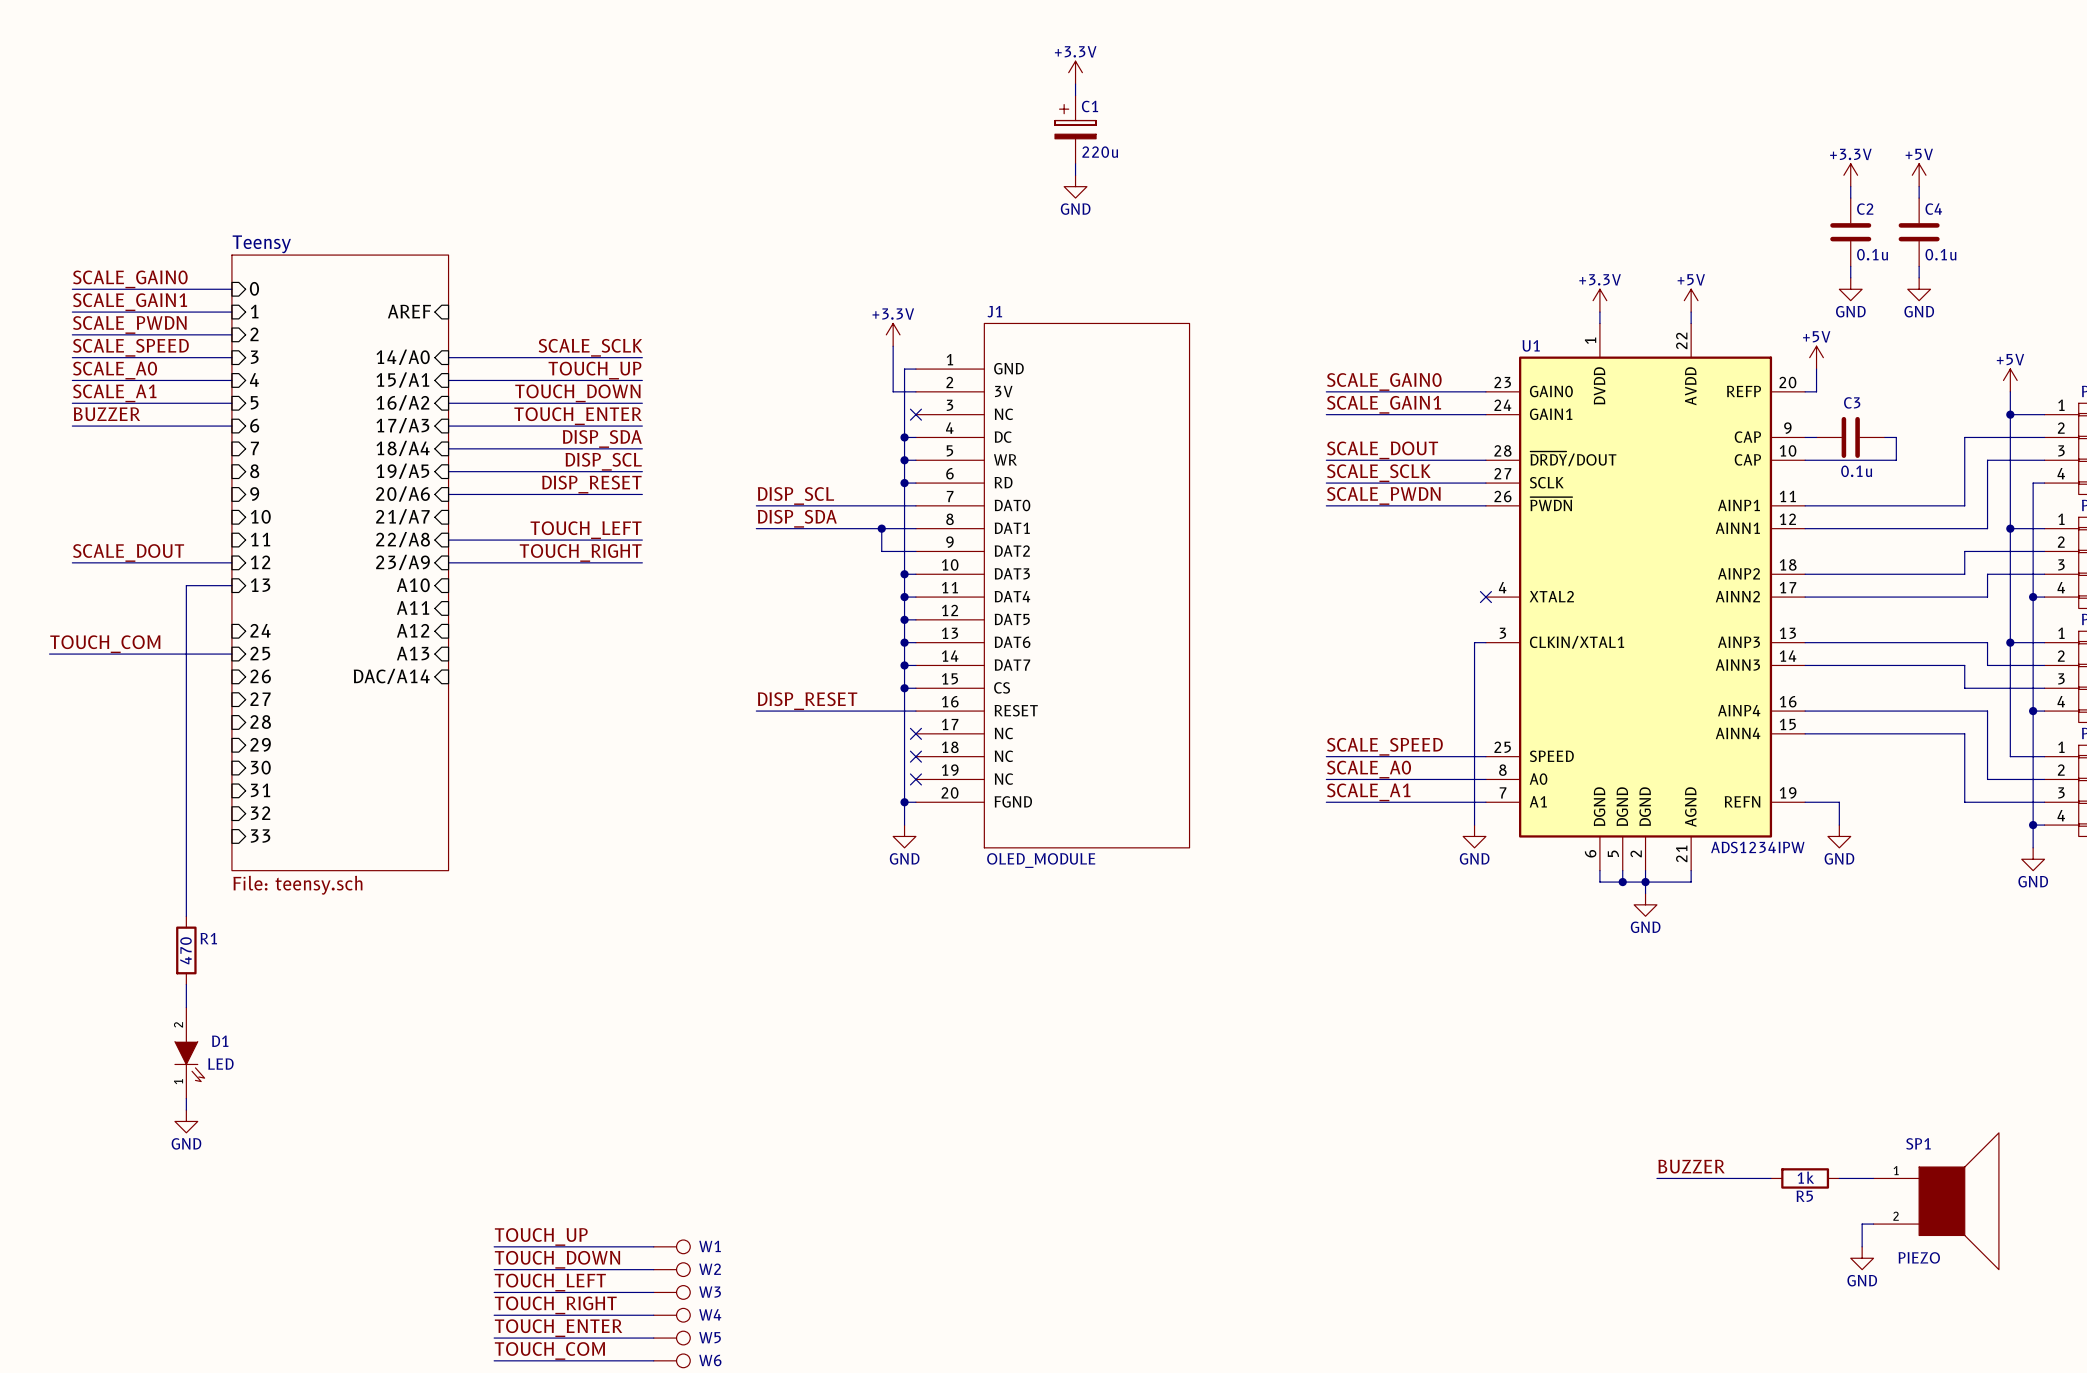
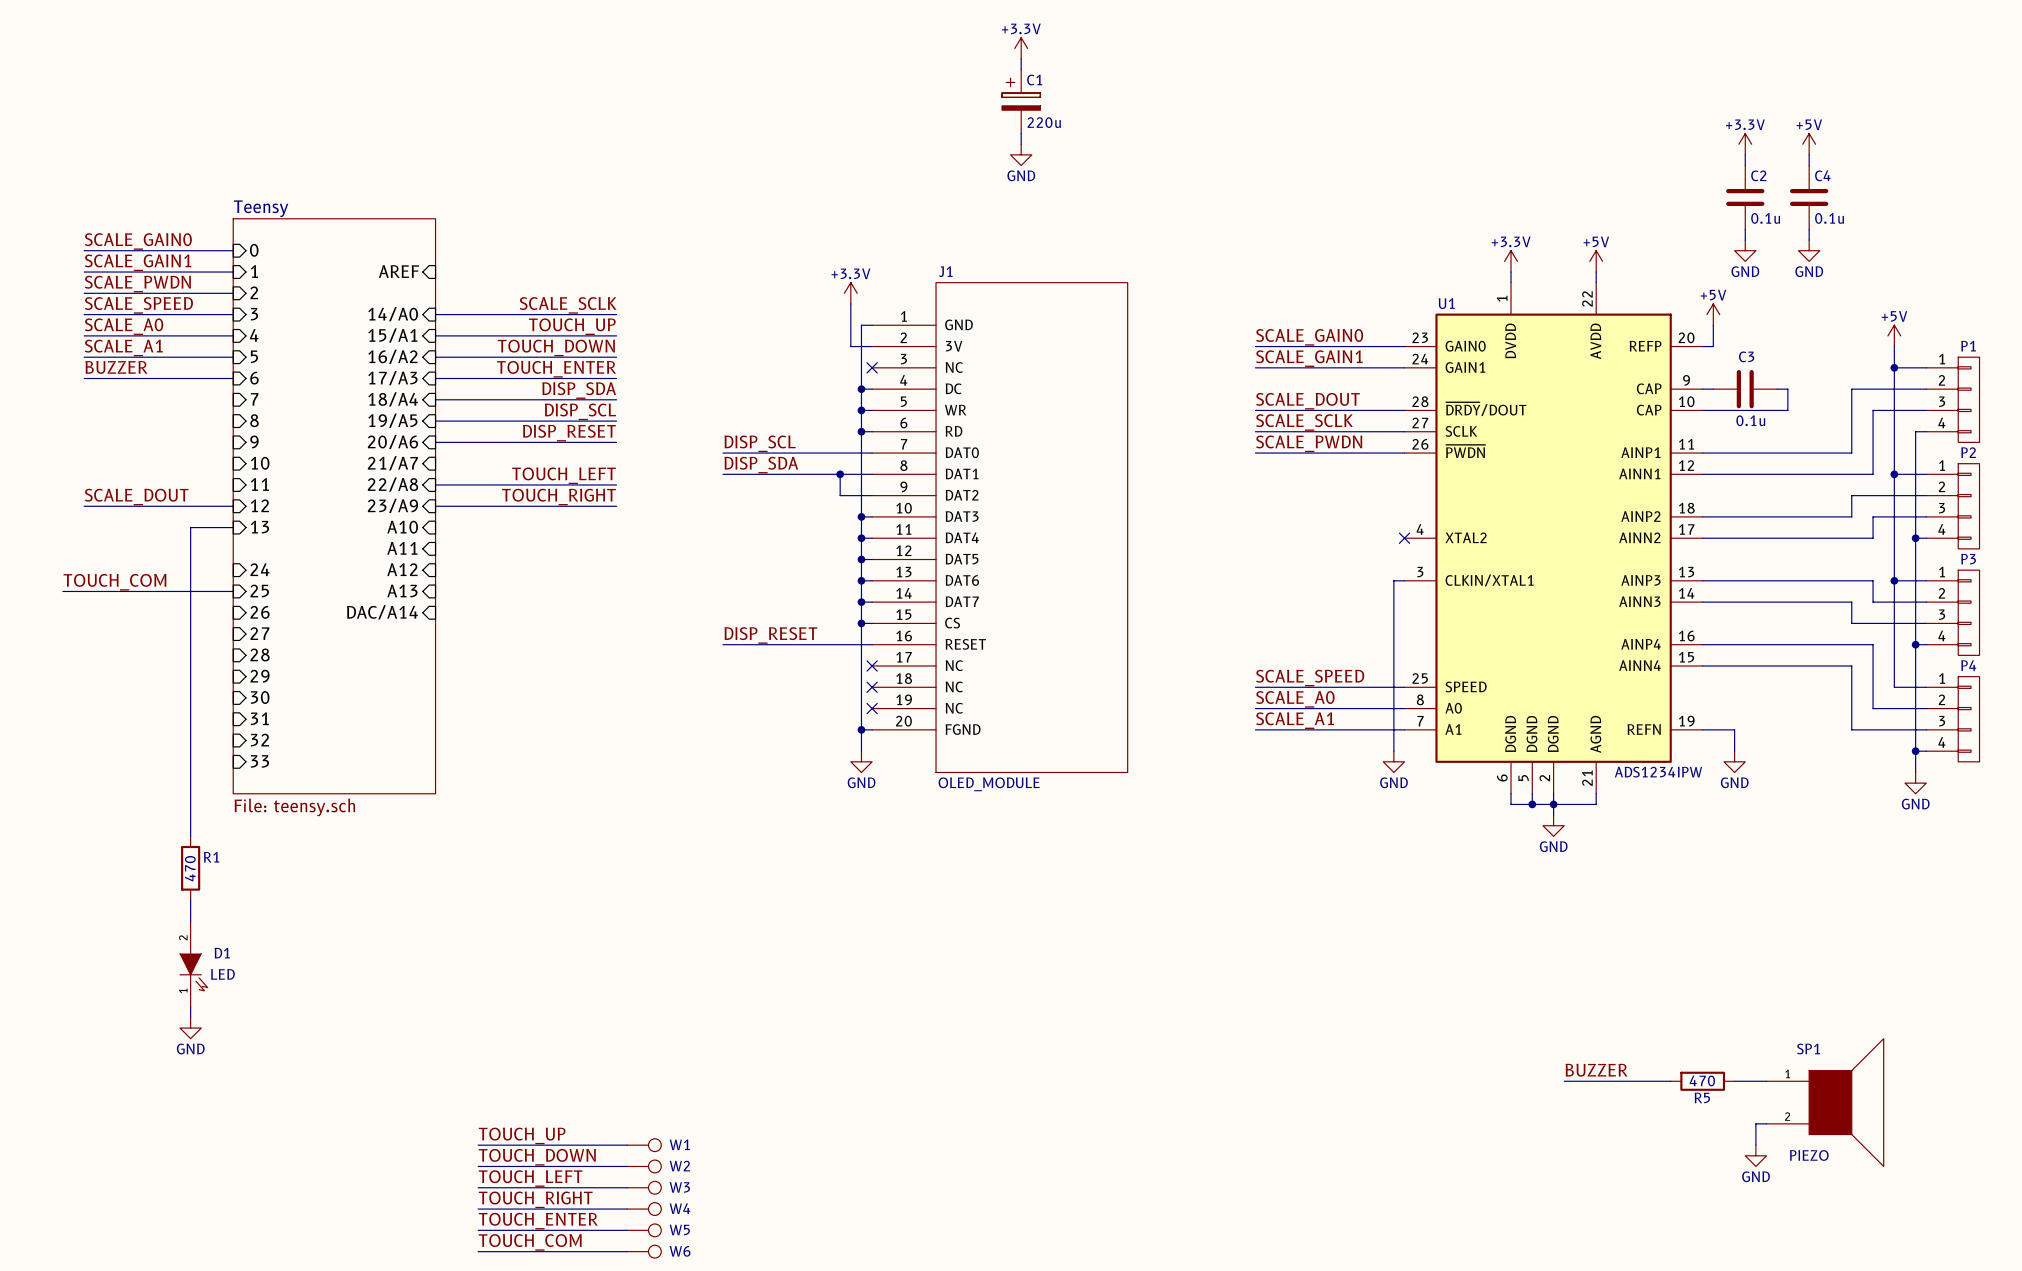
R5 value: 1k (1805, 1177) -> 470 (1702, 1080)

